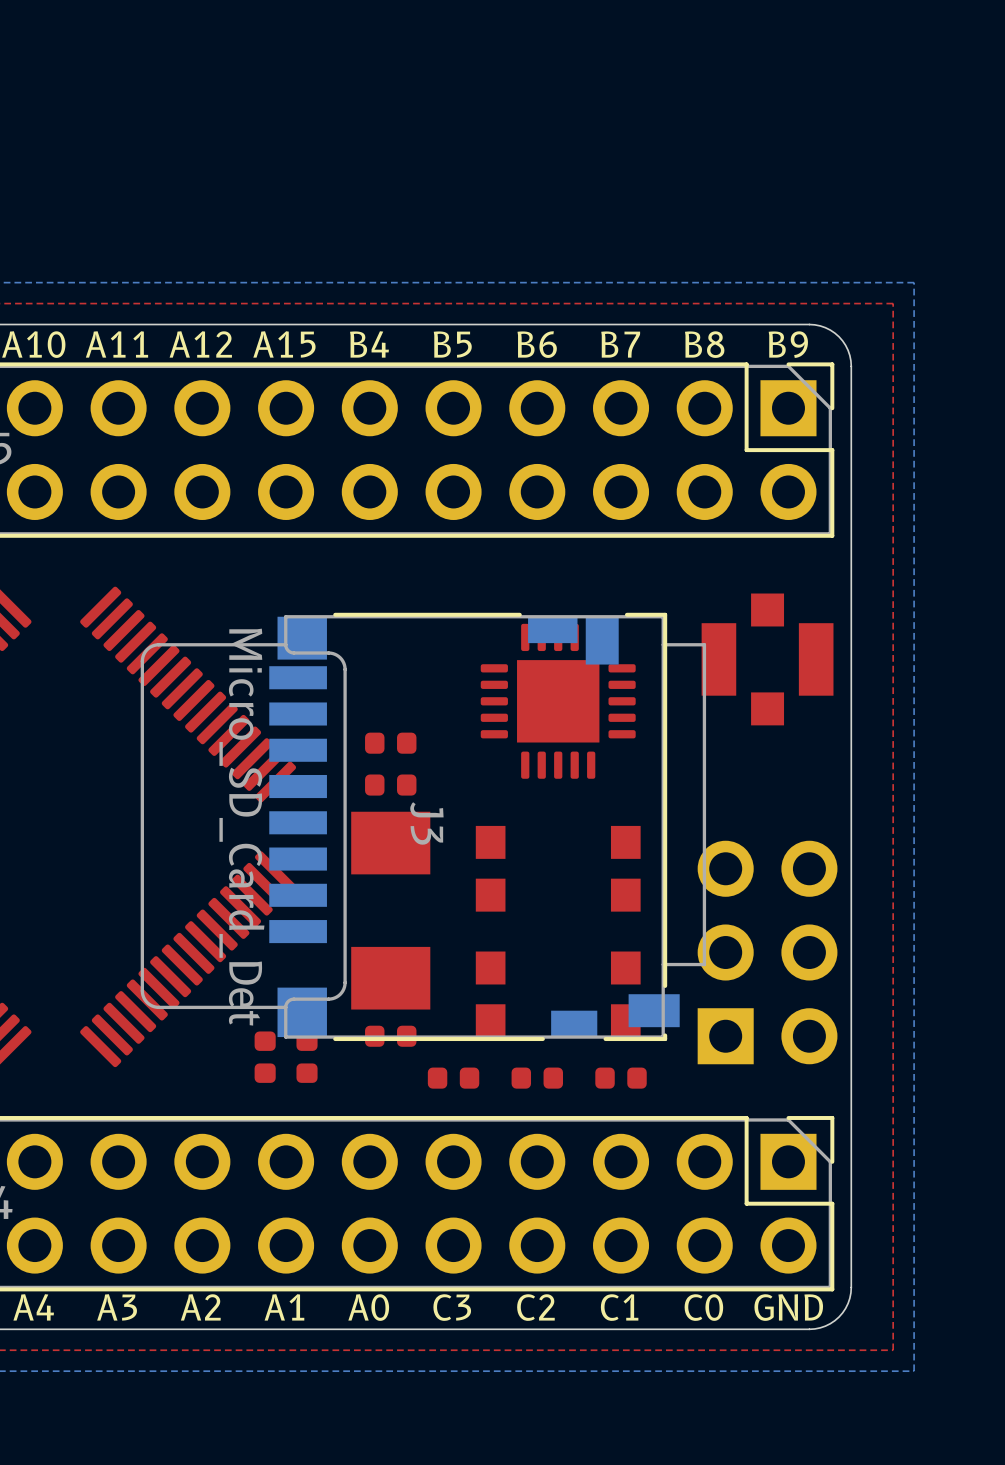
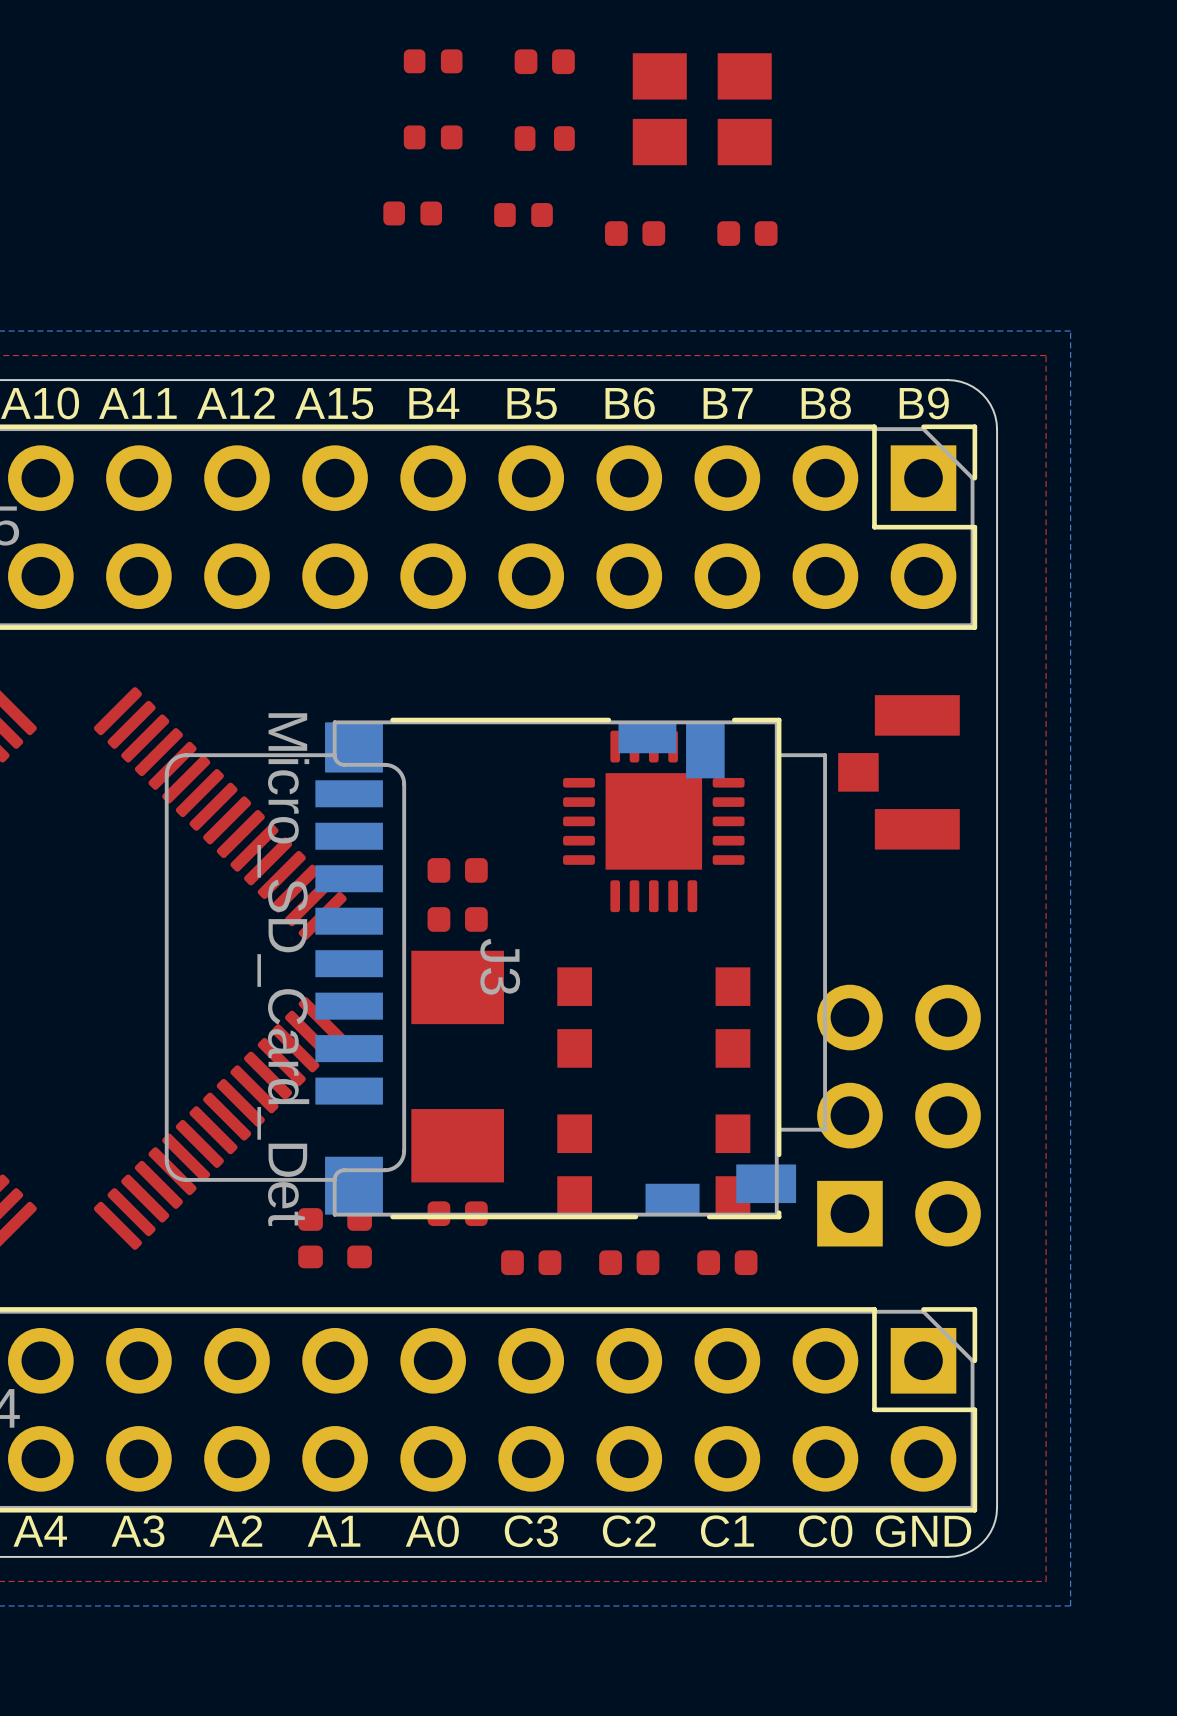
part: none -> (433, 61)
part: none -> (544, 61)
part: none -> (702, 109)
part: none -> (433, 137)
part: none -> (544, 138)
part: none -> (412, 213)
part: none -> (523, 215)
part: none -> (635, 233)
part: none -> (747, 233)
part footprint: [701, 593, 834, 726] -> [838, 695, 960, 850]

